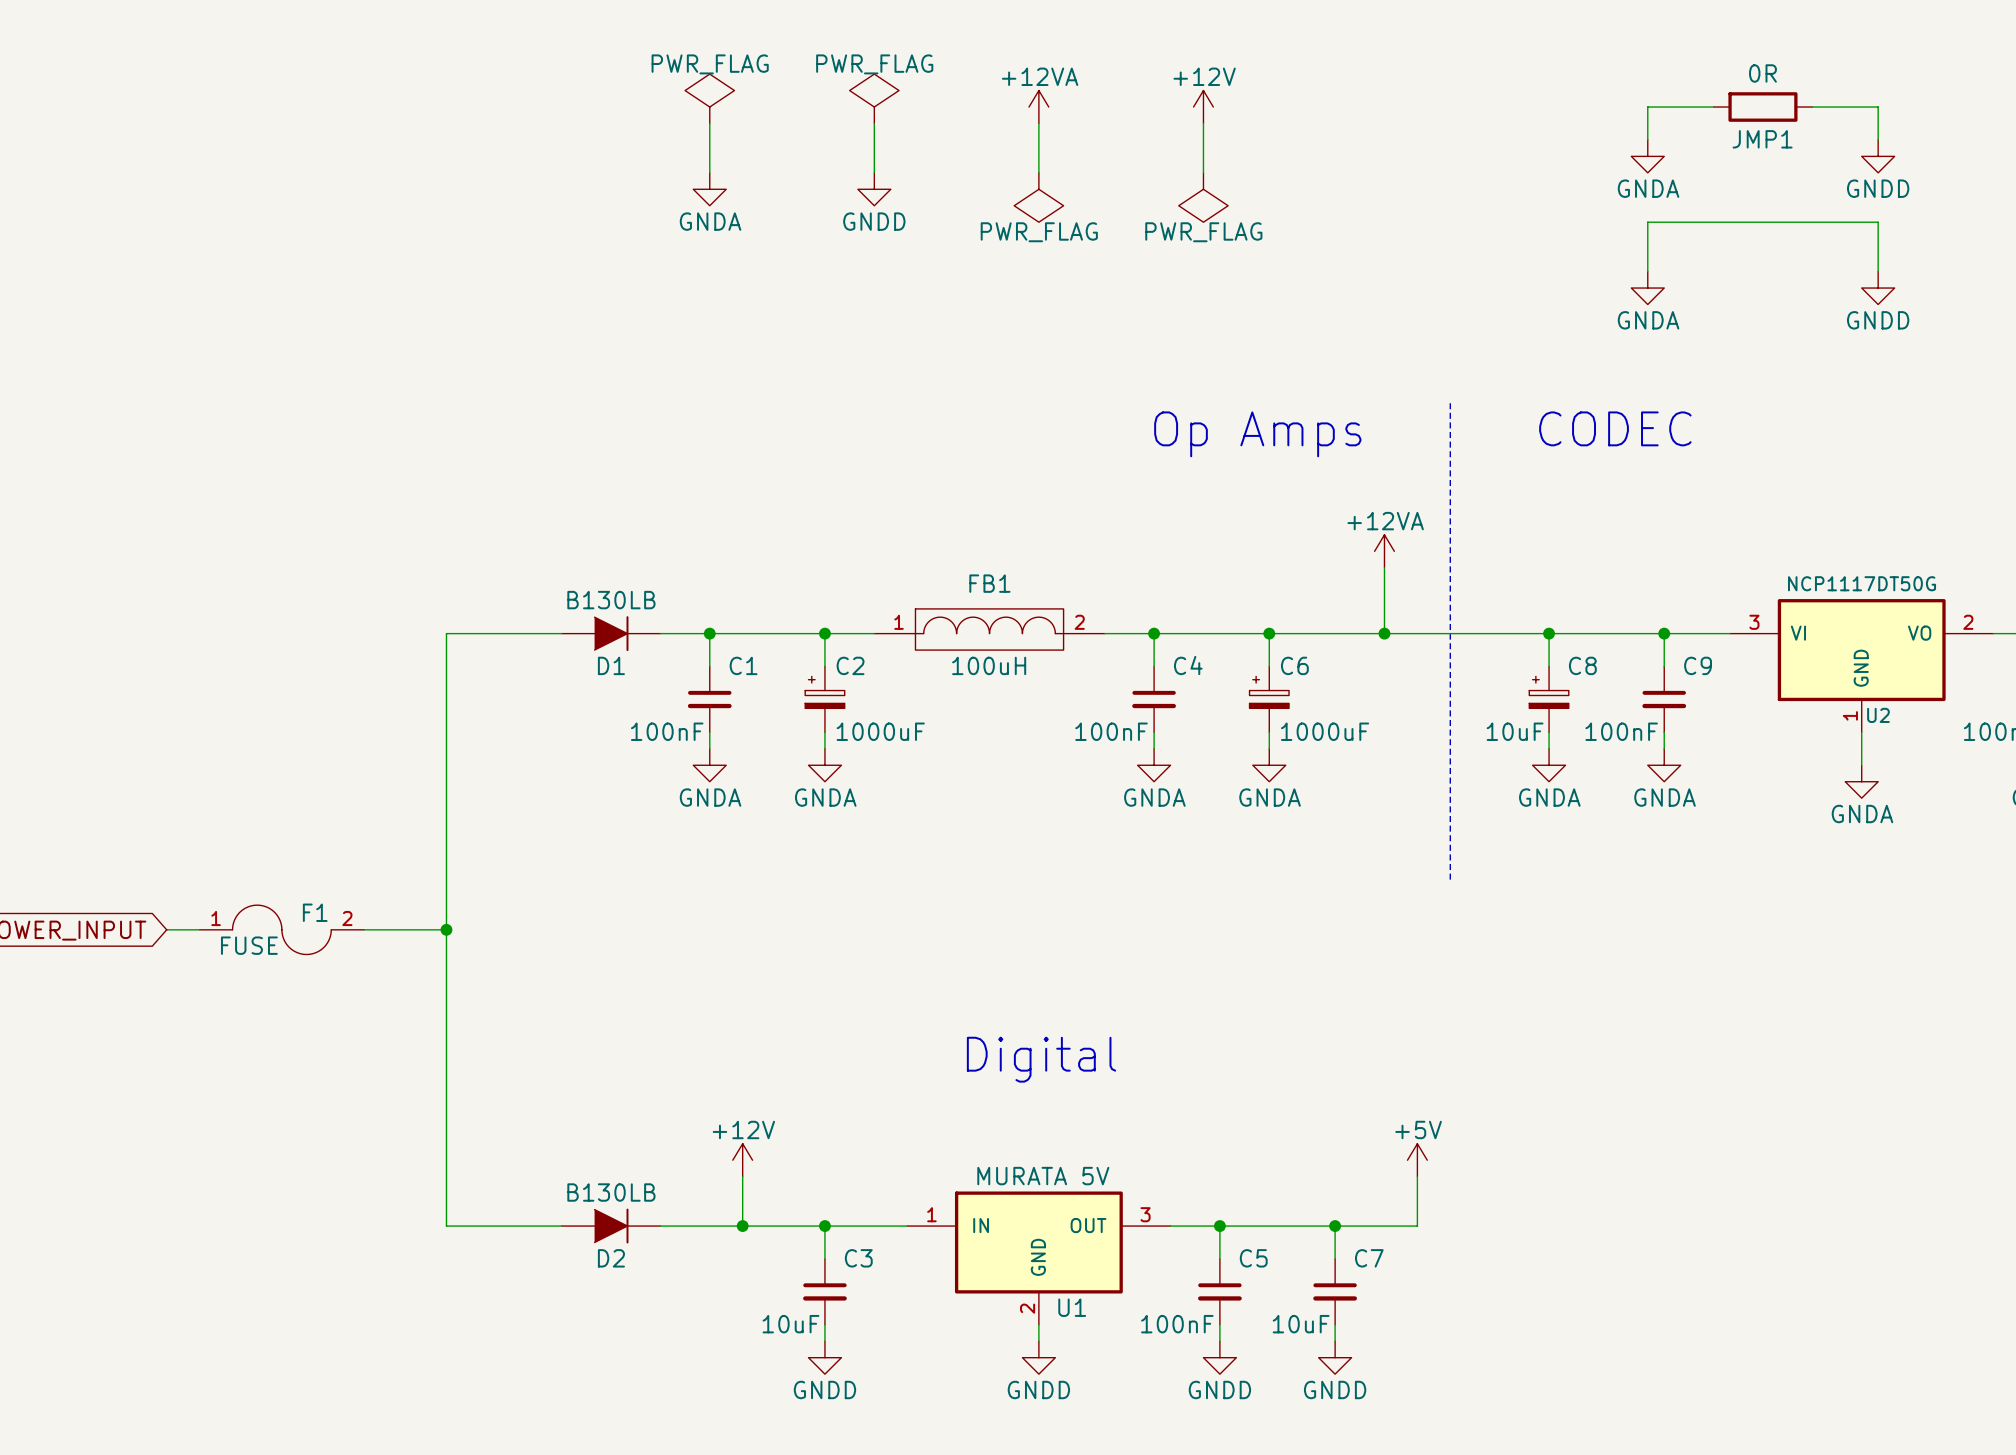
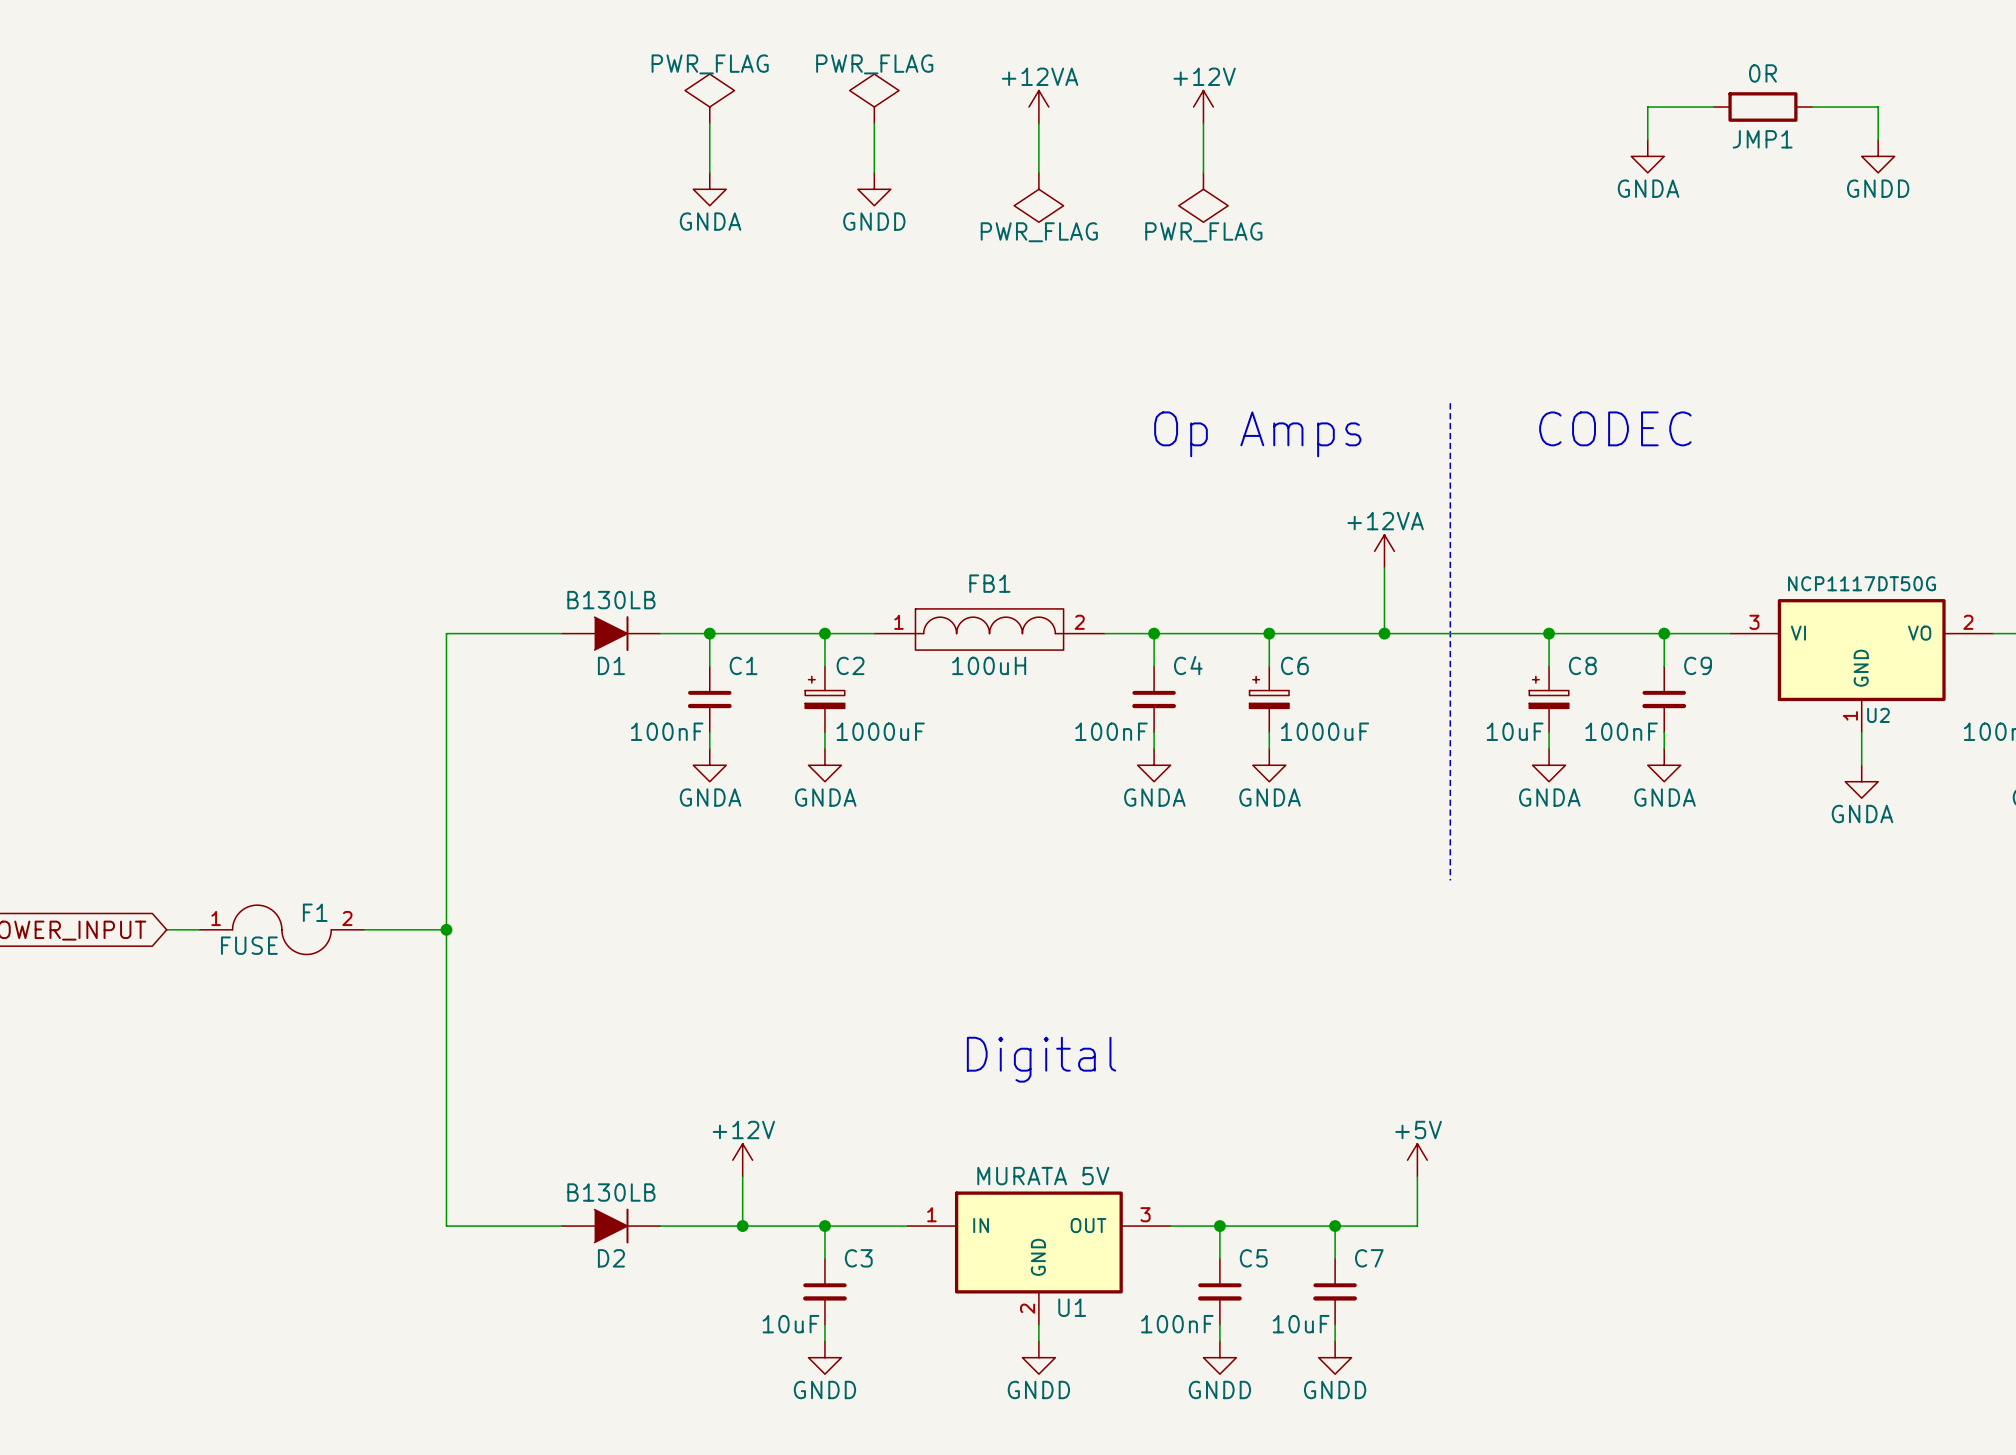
wire: (1647, 271) (1647, 222) (1878, 222) (1878, 271) -> none
power symbol: GNDA (1647, 288) -> none
power symbol: GNDD (1878, 288) -> none

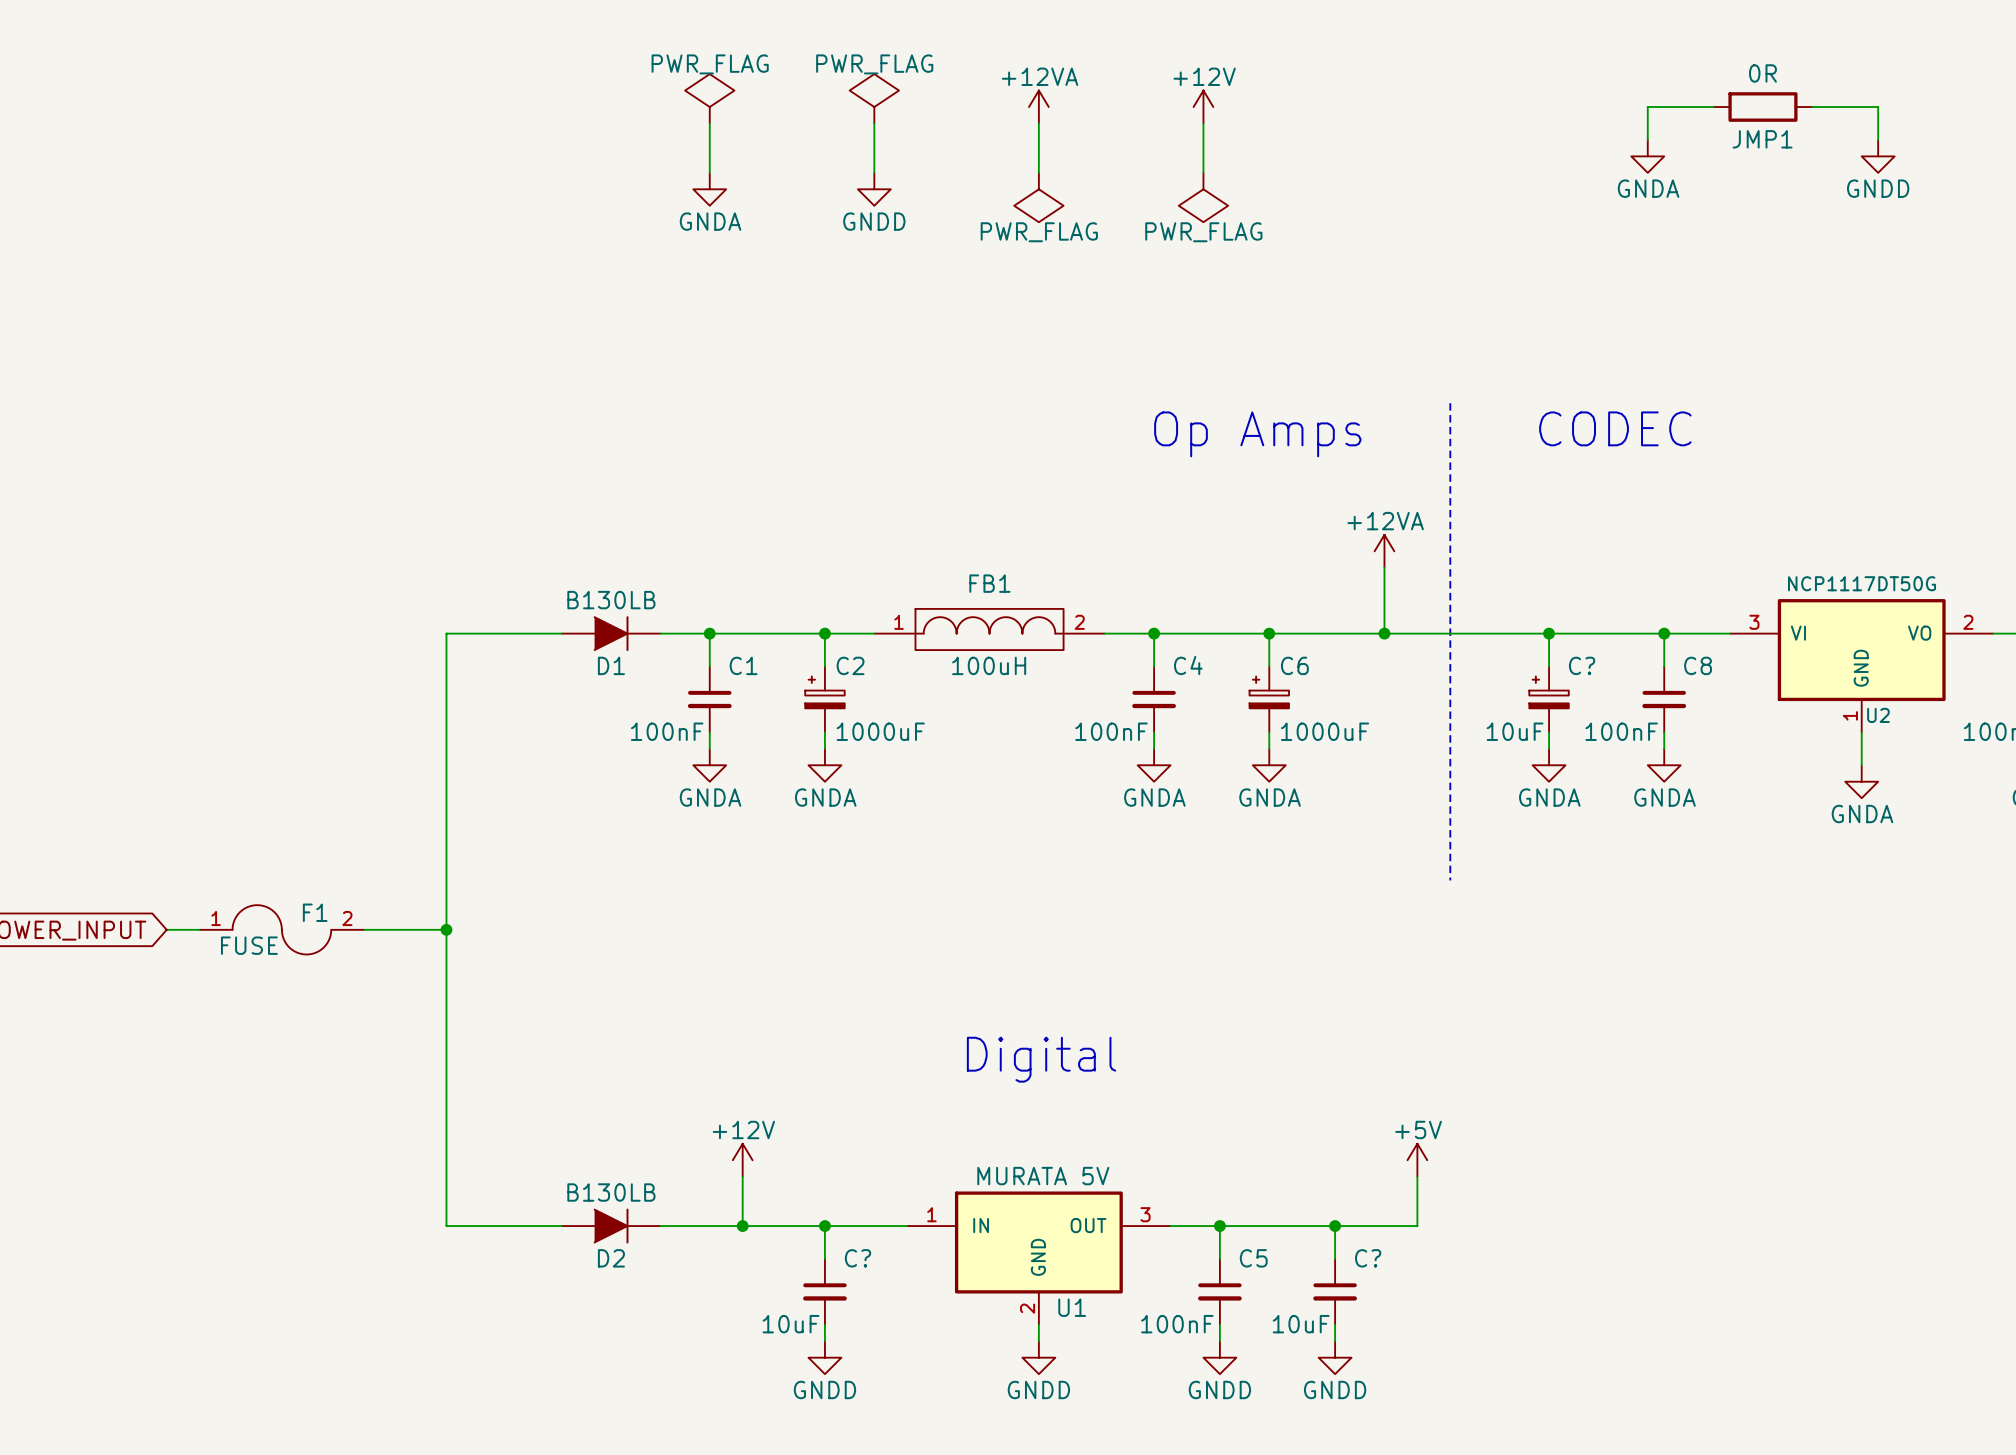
C8 name: C8 (1582, 665) -> C? (1582, 665)
C9 name: C9 (1698, 665) -> C8 (1698, 665)
C3 name: C3 (858, 1258) -> C? (858, 1258)
C7 name: C7 (1369, 1258) -> C? (1368, 1258)

